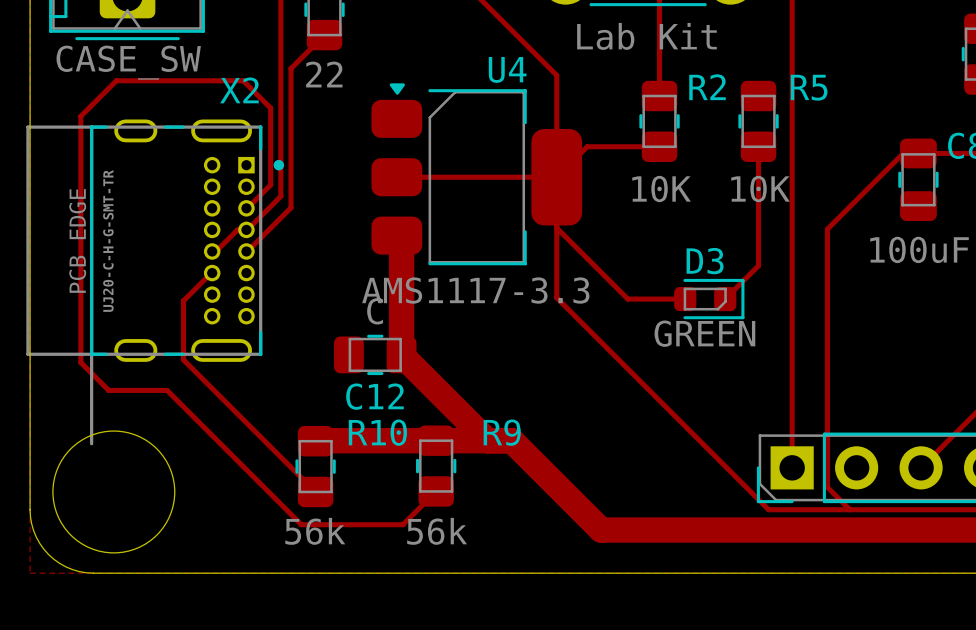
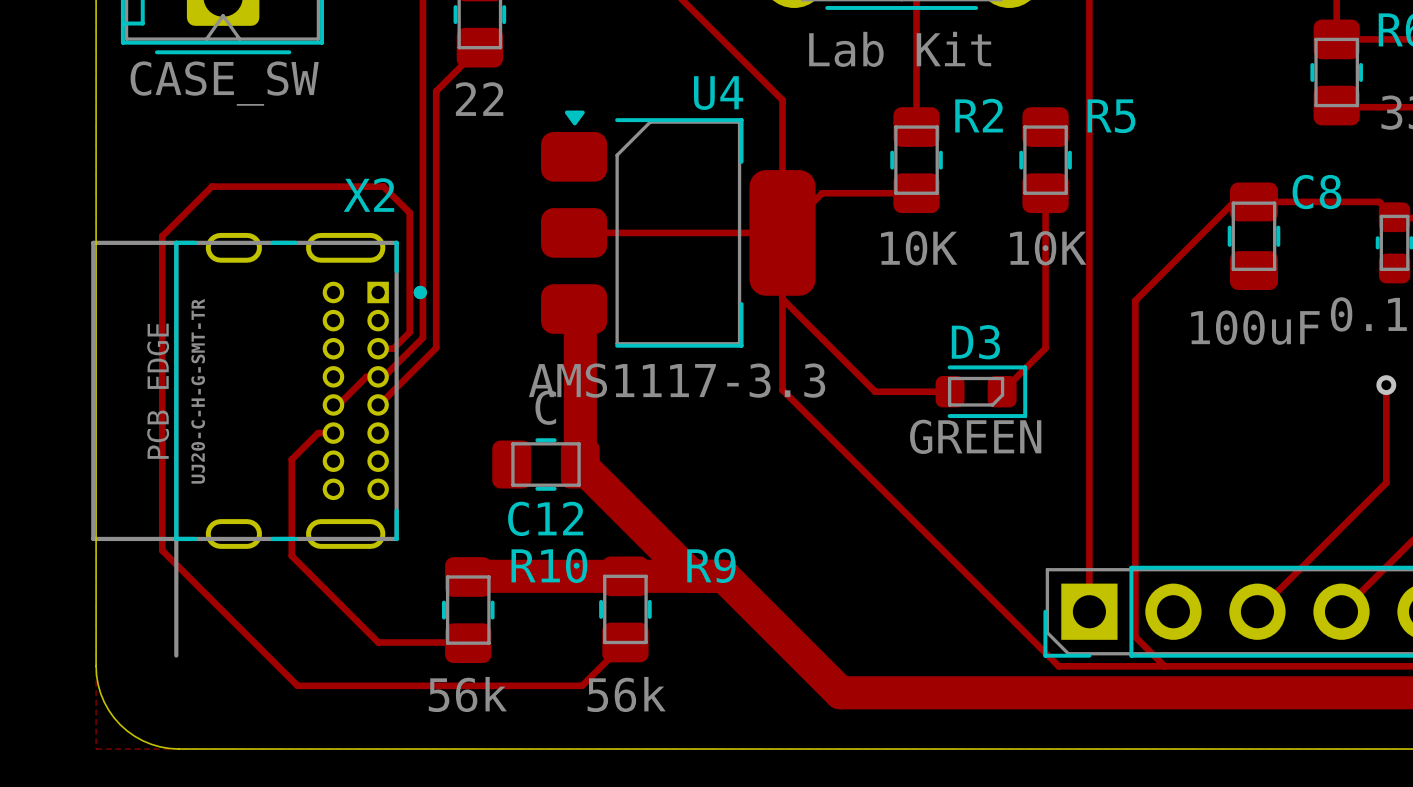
track: (270, 161) (270, 108) (243, 80) (116, 80) (80, 116) (80, 179) -> (409, 212) (383, 186) (211, 186) (162, 236)
track: (270, 184) (246, 208) -> (409, 242) (409, 332) (393, 348) (378, 348)
track: (280, 196) (247, 229) (237, 229) (216, 251) (212, 251) -> (422, 257) (422, 337) (383, 376) (366, 376) (338, 404) (333, 404)
track: (291, 207) (246, 251) -> (436, 272) (436, 348) (378, 404)
track: (212, 273) (183, 300) (183, 359) (315, 491) -> (333, 433) (318, 433) (291, 459) (291, 555) (378, 642) (467, 642)
X2 position: (155, 282) -> (259, 445)
track: (80, 362) (108, 390) (167, 390) (301, 524) -> (162, 474) (162, 550) (297, 685) (449, 685)
round board edge: [52, 430, 176, 554] -> none

